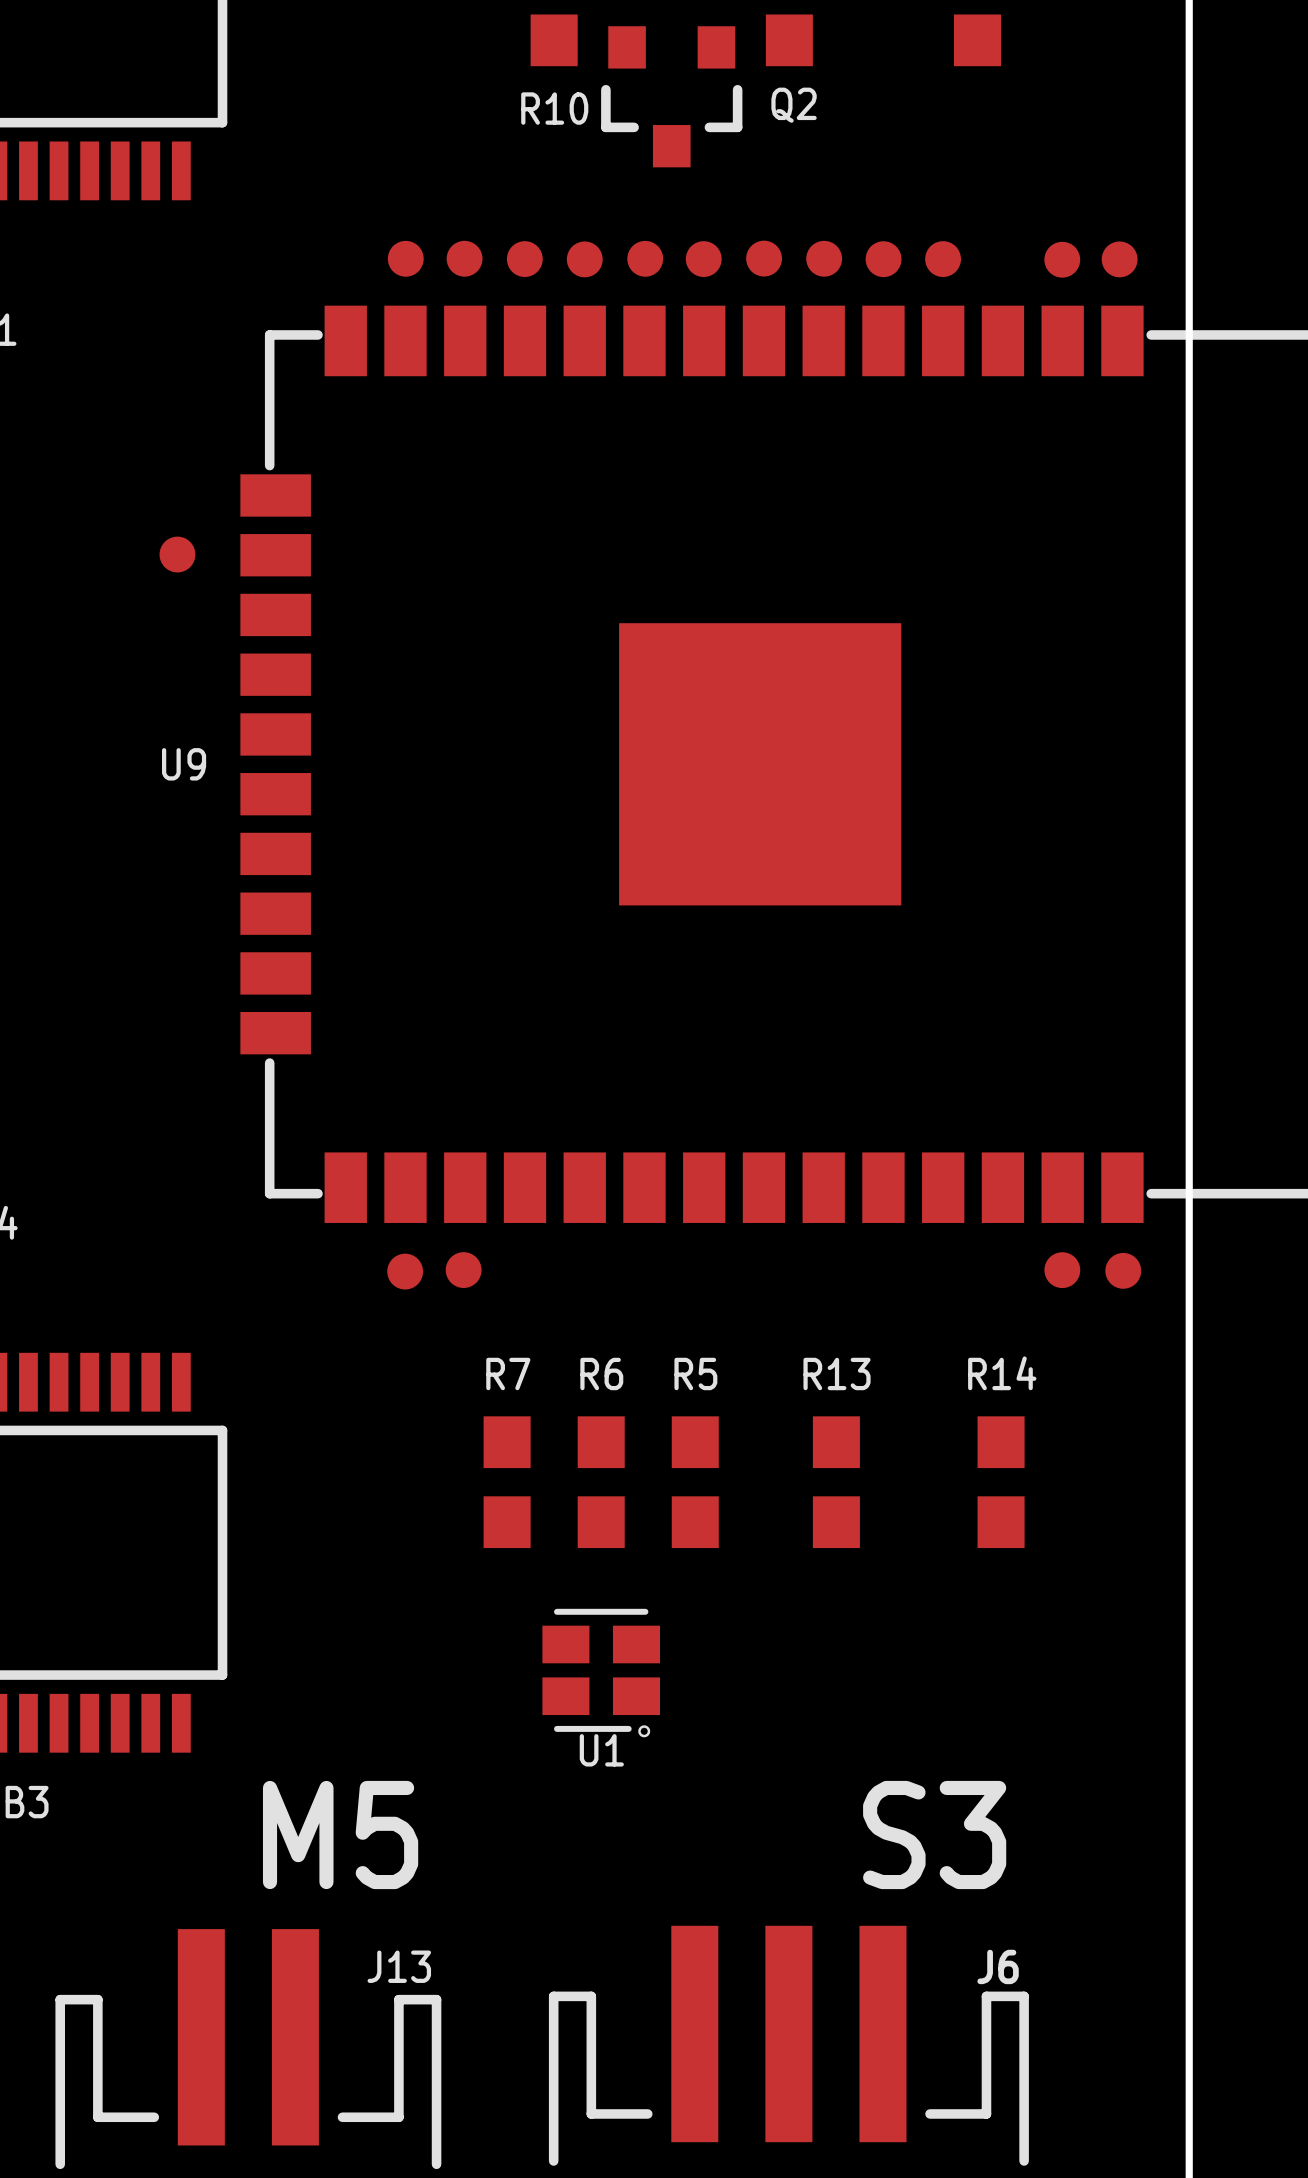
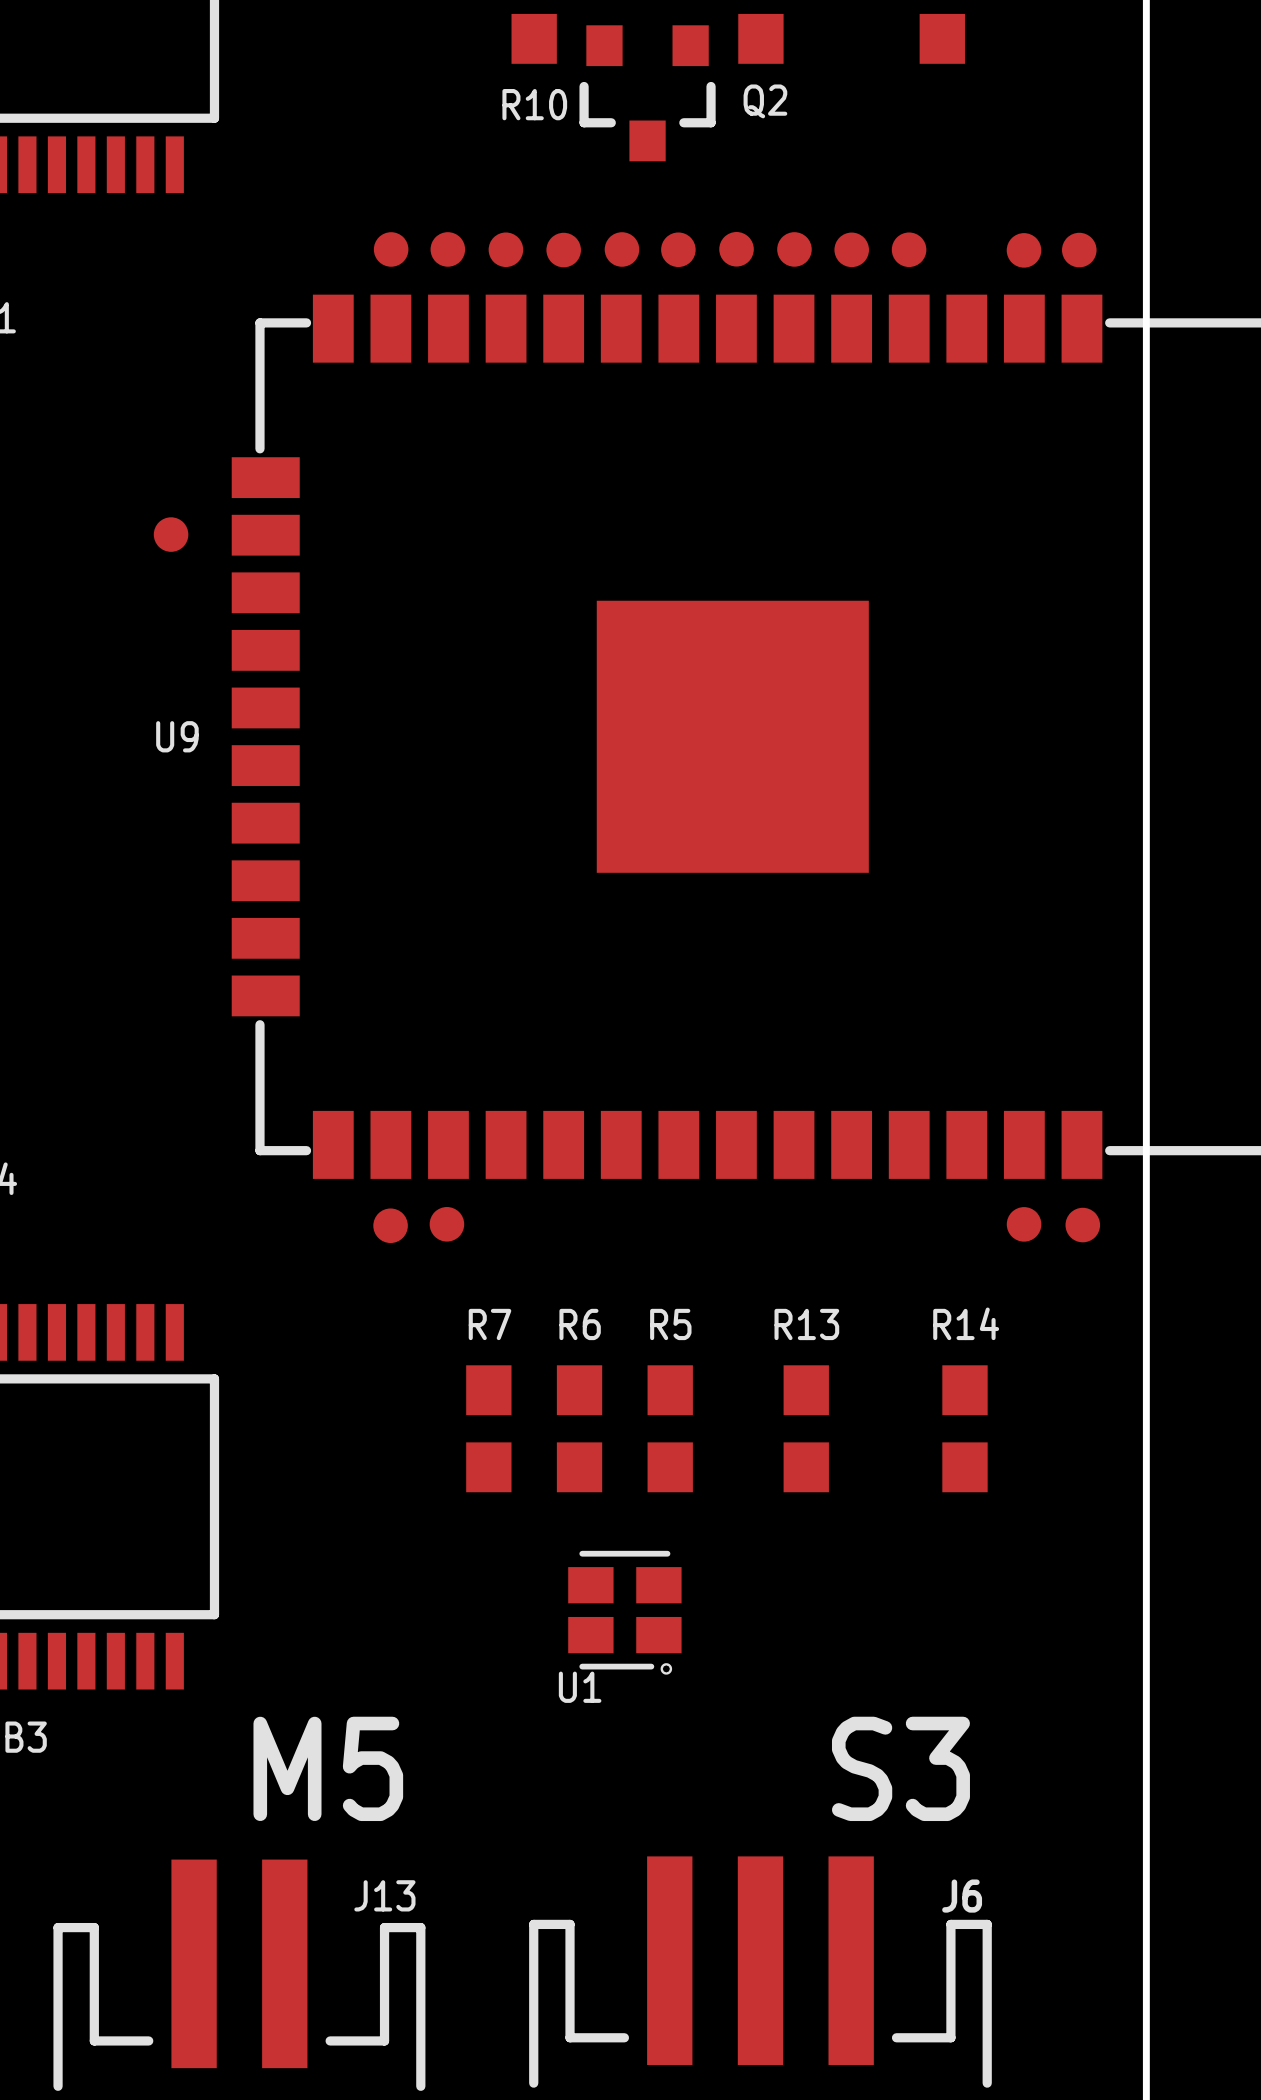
part position: (601, 1673) -> (624, 1612)

